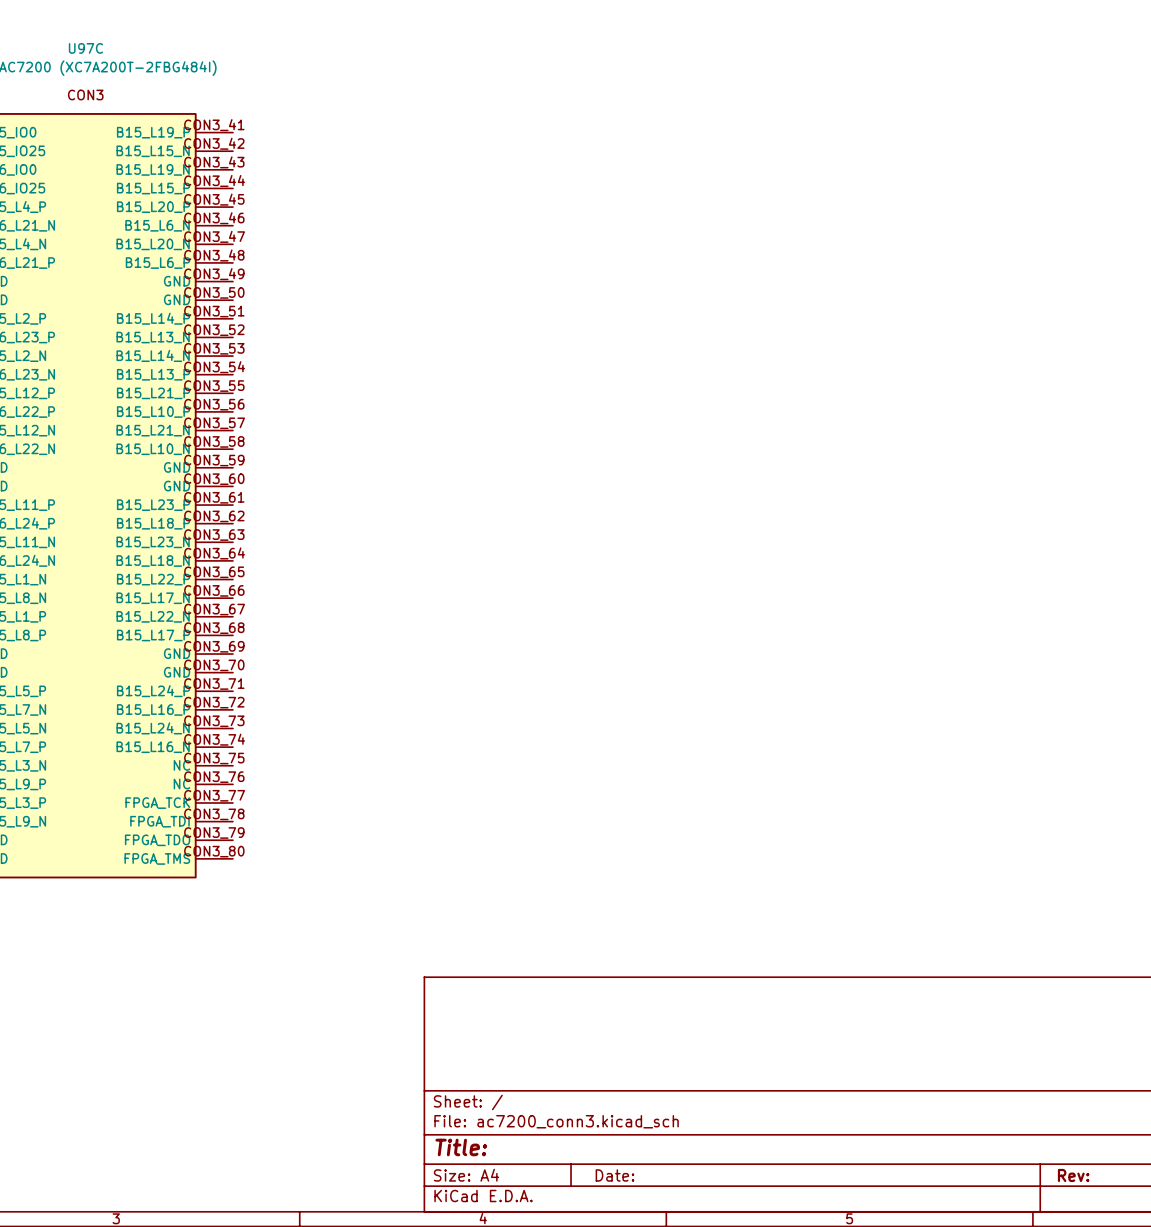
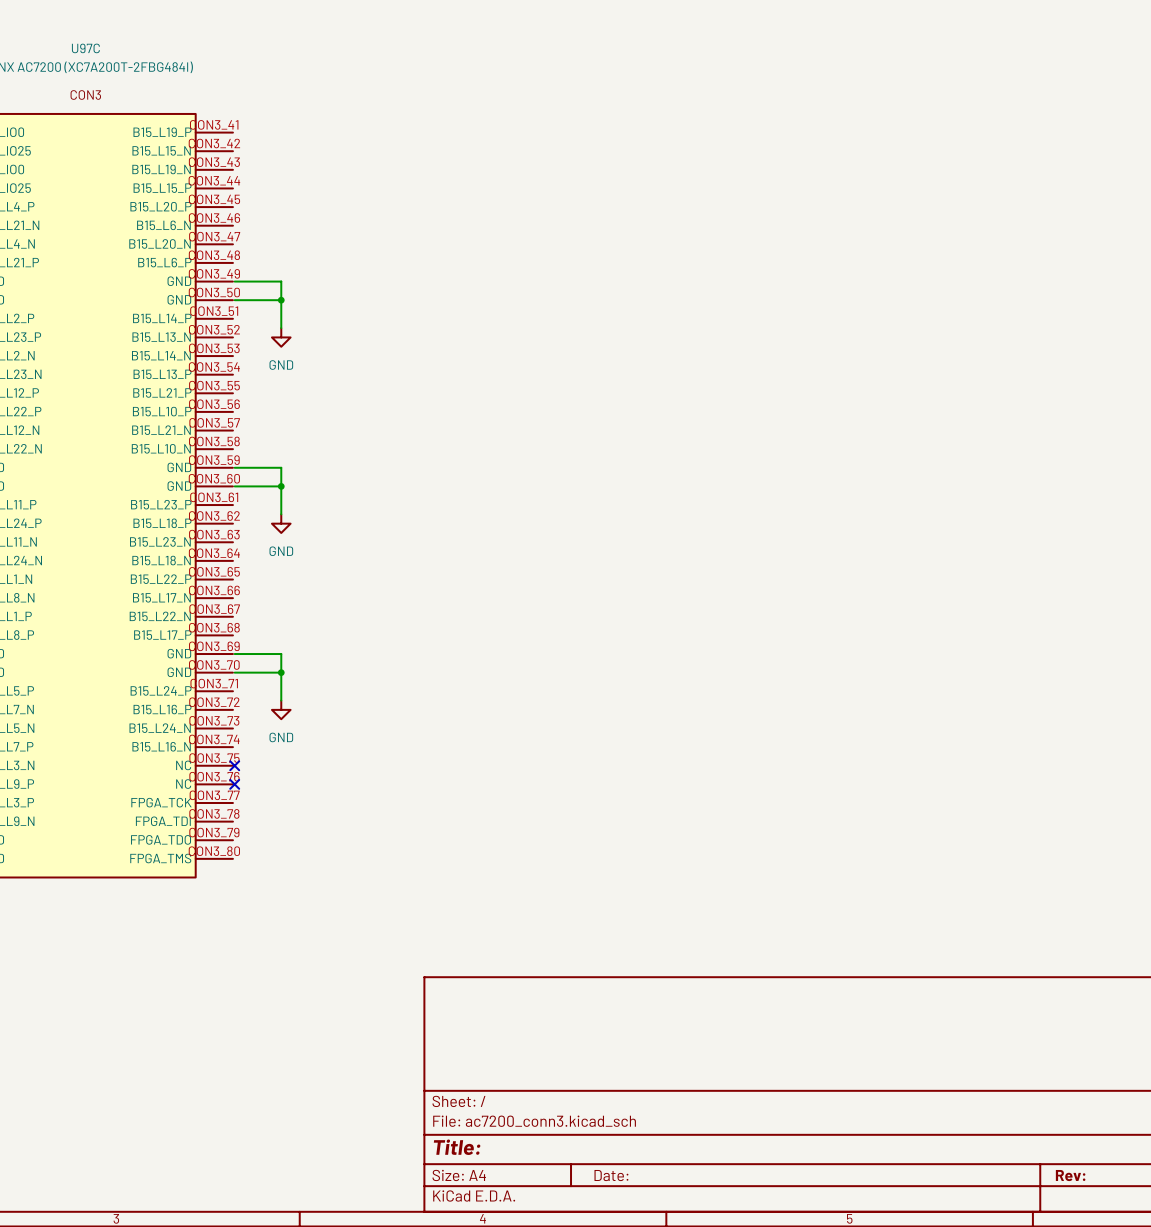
wire: none -> (234, 281) (281, 281) (281, 328)
wire: none -> (234, 300) (281, 300)
junction: none -> (281, 300)
power symbol: none -> GND (281, 337)
wire: none -> (234, 467) (281, 467) (281, 514)
wire: none -> (234, 486) (281, 486)
junction: none -> (281, 486)
power symbol: none -> GND (281, 523)
wire: none -> (234, 654) (281, 654) (281, 700)
wire: none -> (234, 672) (281, 672)
junction: none -> (281, 672)
power symbol: none -> GND (281, 709)
no-connect mark: none -> (234, 765)
no-connect mark: none -> (234, 784)

